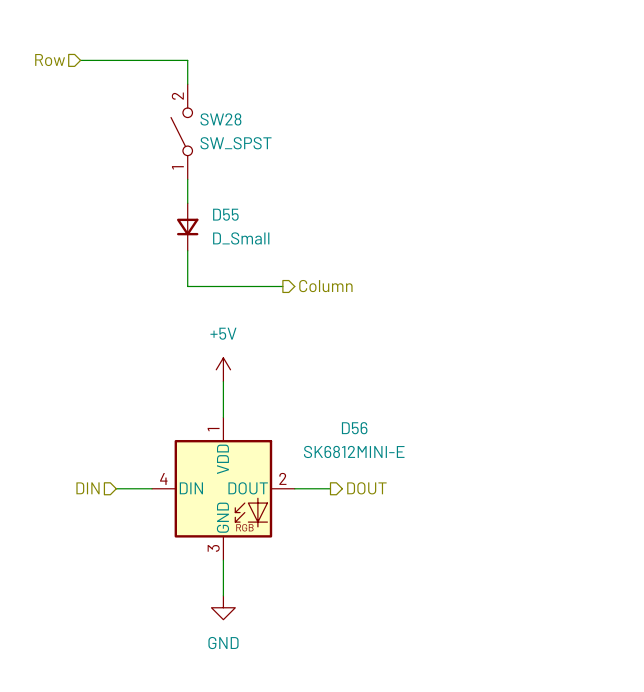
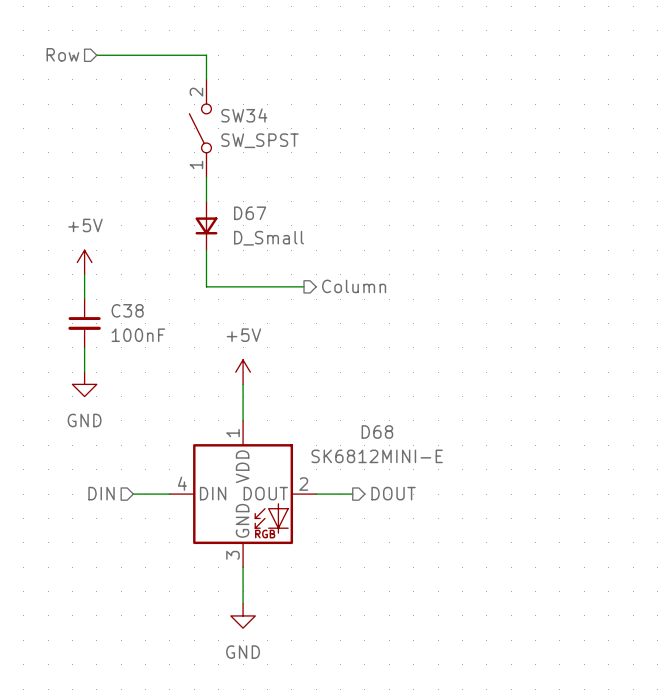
SW28 name: SW28 (220, 119) -> SW34 (244, 115)
D55 name: D55 (225, 214) -> D67 (250, 213)
power symbol: none -> +5V (84, 262)
wire: none -> (84, 274) (84, 299)
C38: none -> 100nF (84, 323)
wire: none -> (84, 347) (84, 372)
power symbol: none -> GND (84, 384)
D56 name: D56 (354, 428) -> D68 (377, 432)

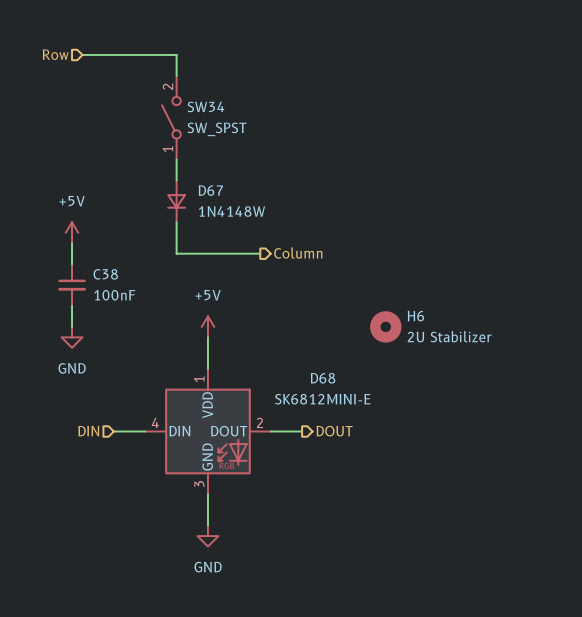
D67 value: D_Small (268, 238) -> 1N4148W (231, 211)
H6: none -> 2U Stabilizer (385, 326)

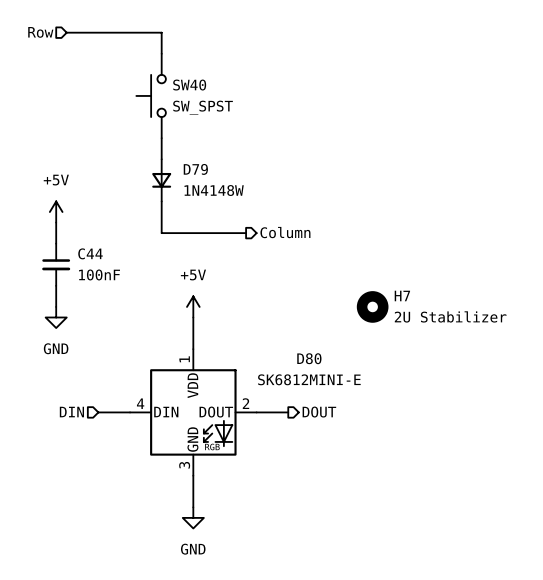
SW40: none -> SW_SPST (151, 95)
SW34: SW_SPST (171, 117) -> none
D67 name: D67 (210, 190) -> D79 (195, 169)
C38 name: C38 (105, 274) -> C44 (90, 253)
H6 name: H6 (415, 316) -> H7 (402, 296)
D68 name: D68 (323, 378) -> D80 (309, 358)

